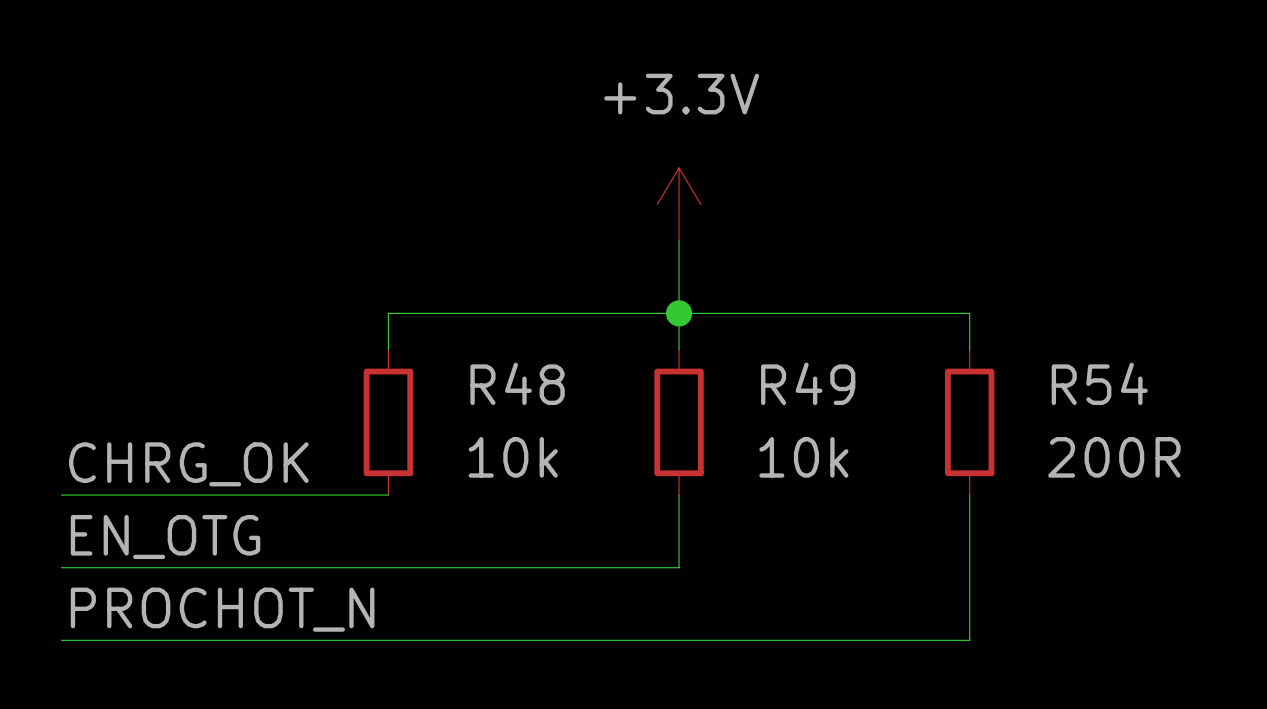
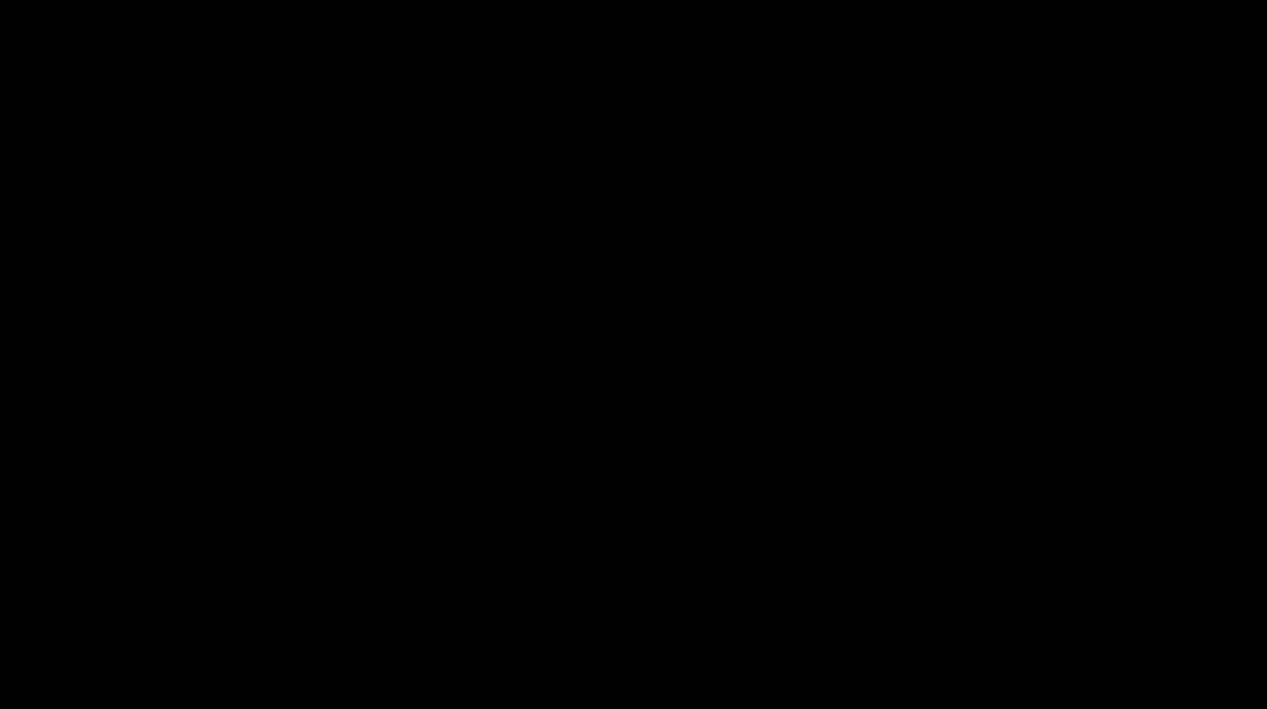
power symbol: +3.3V (679, 204) -> none
wire: (679, 240) (679, 349) -> none
junction: (679, 313) -> none
wire: (388, 349) (388, 313) (969, 313) (969, 349) -> none
R48: 10k (388, 422) -> none
R49: 10k (679, 422) -> none
R54: 200R (969, 422) -> none
label: CHRG_OK (188, 464) -> none
wire: (61, 495) (388, 495) -> none
wire: (679, 495) (679, 567) (61, 567) -> none
wire: (969, 495) (969, 640) (61, 640) -> none
label: EN_OTG (165, 537) -> none
label: PROCHOT_N (222, 609) -> none

